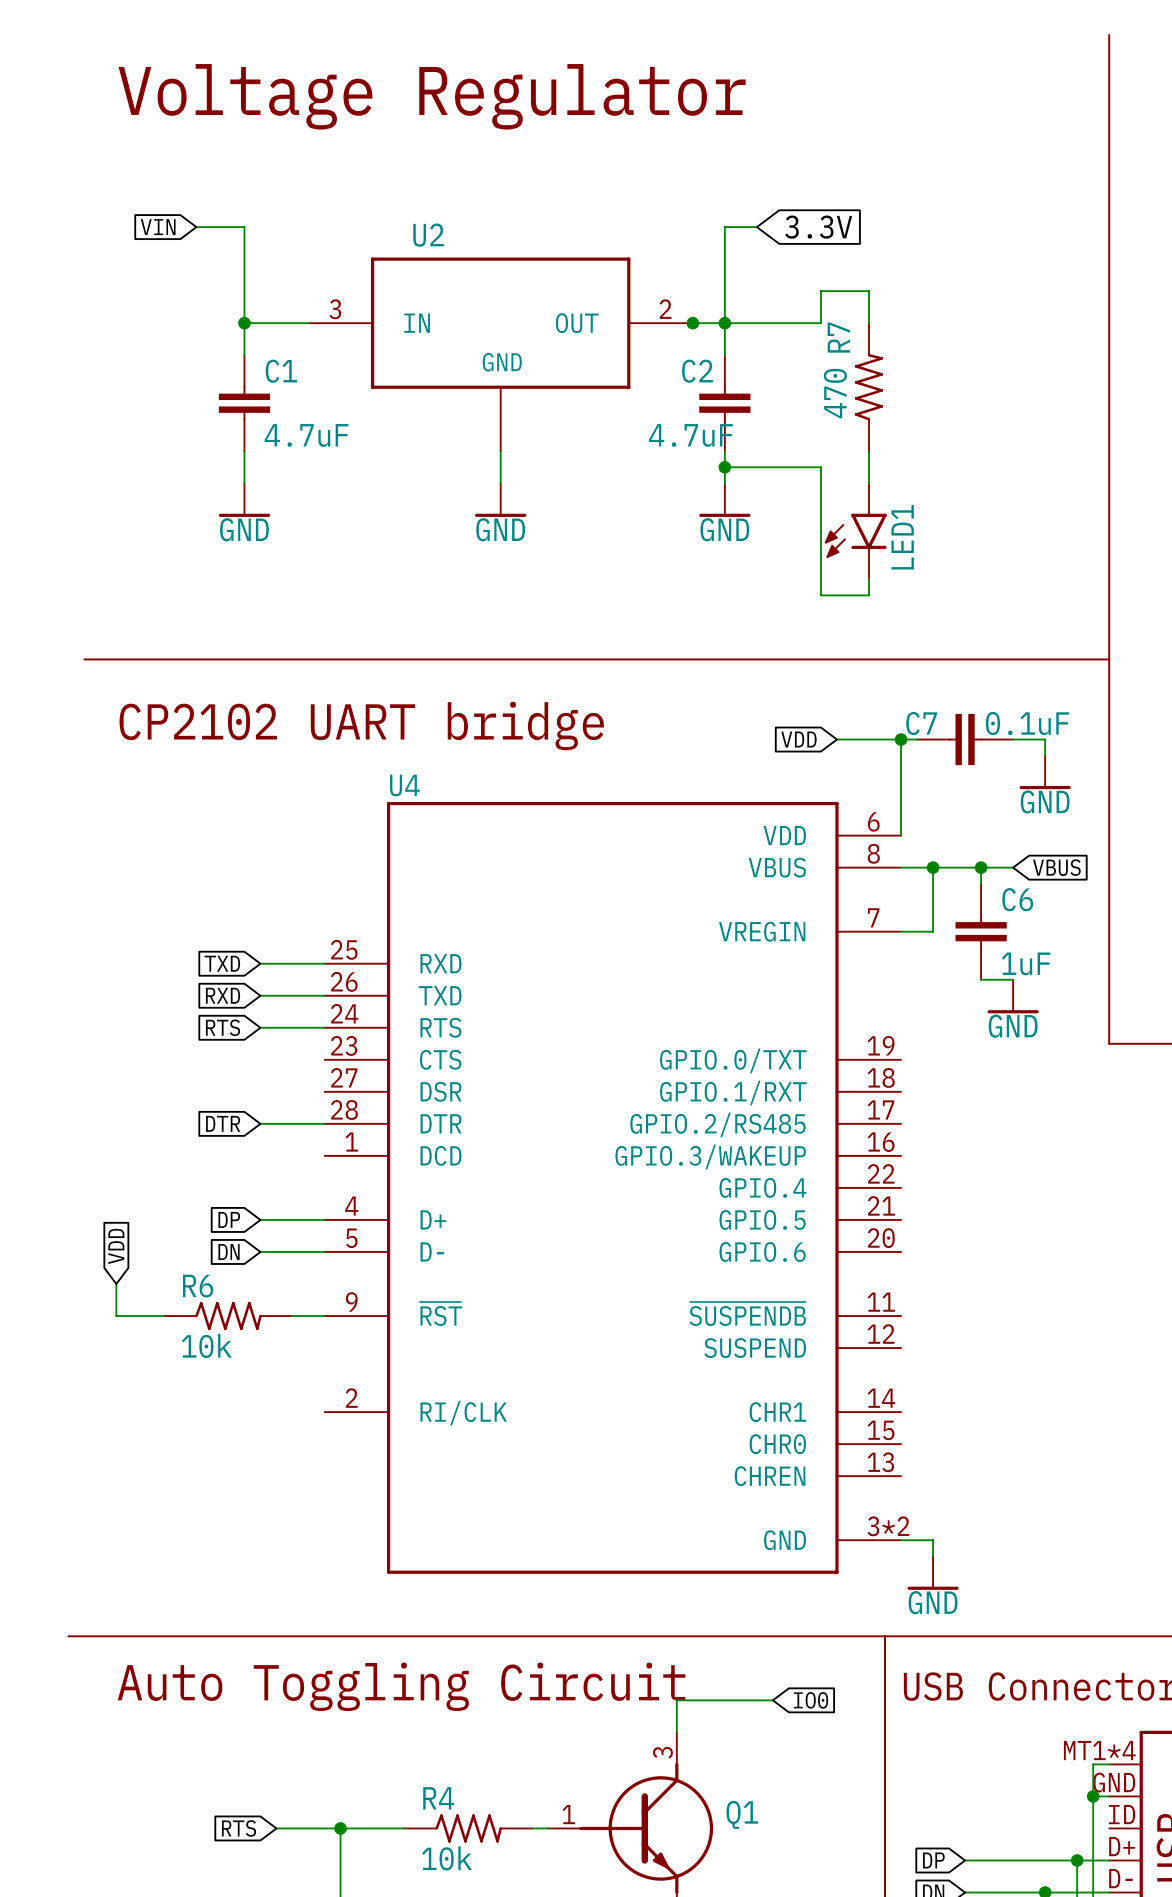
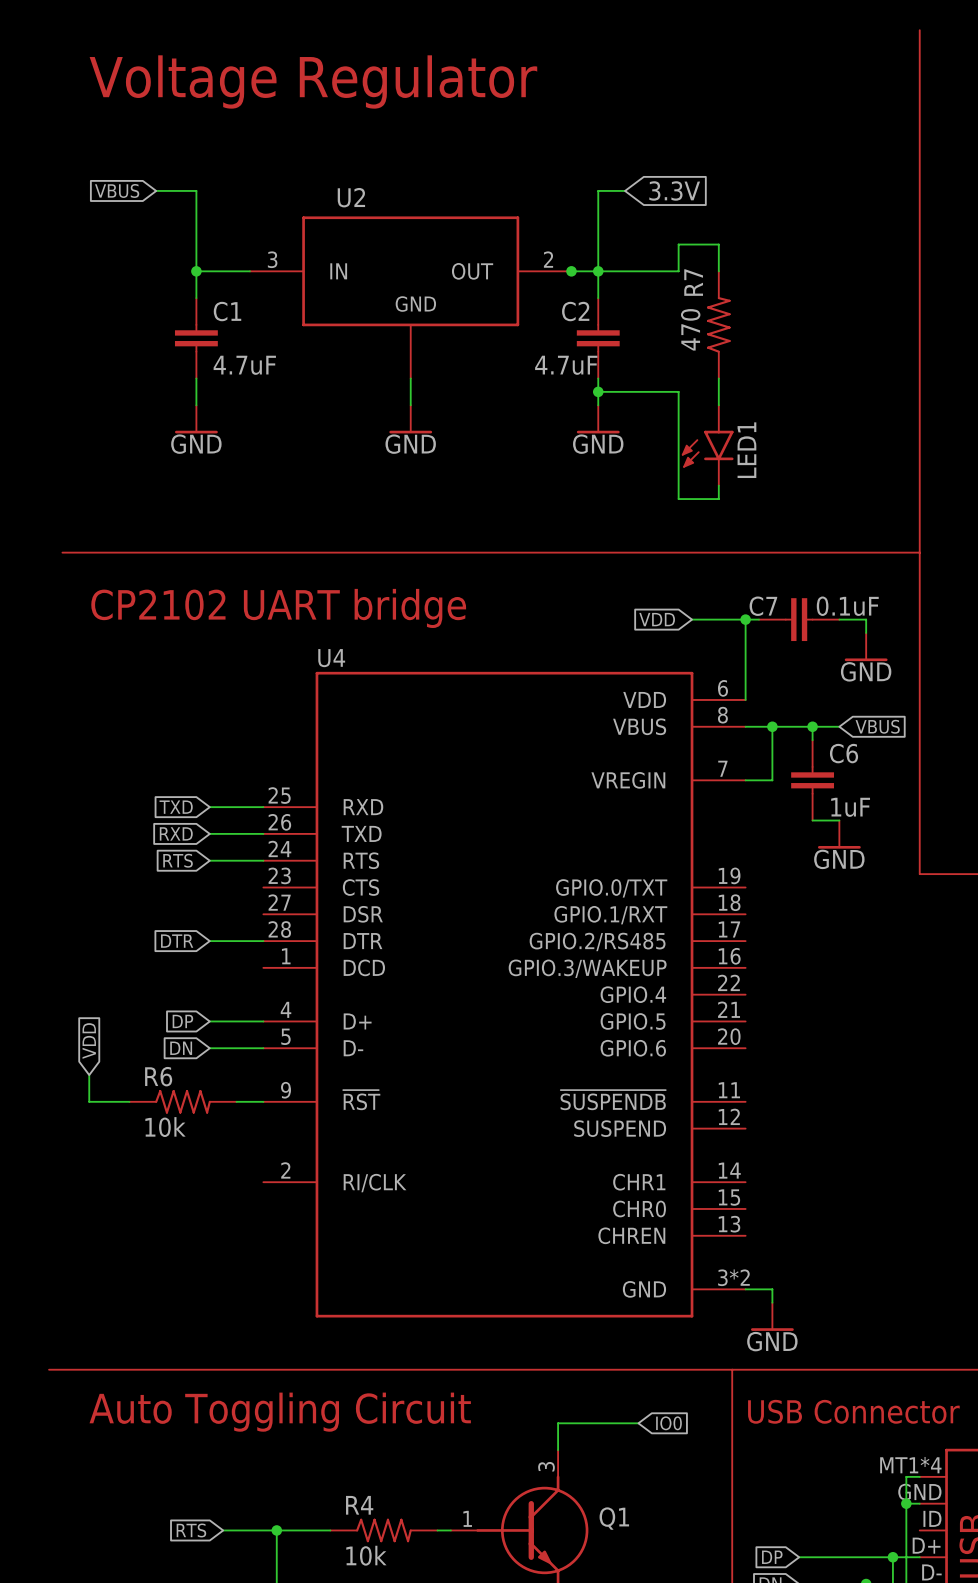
global label: VIN (158, 227) -> VBUS (117, 190)

